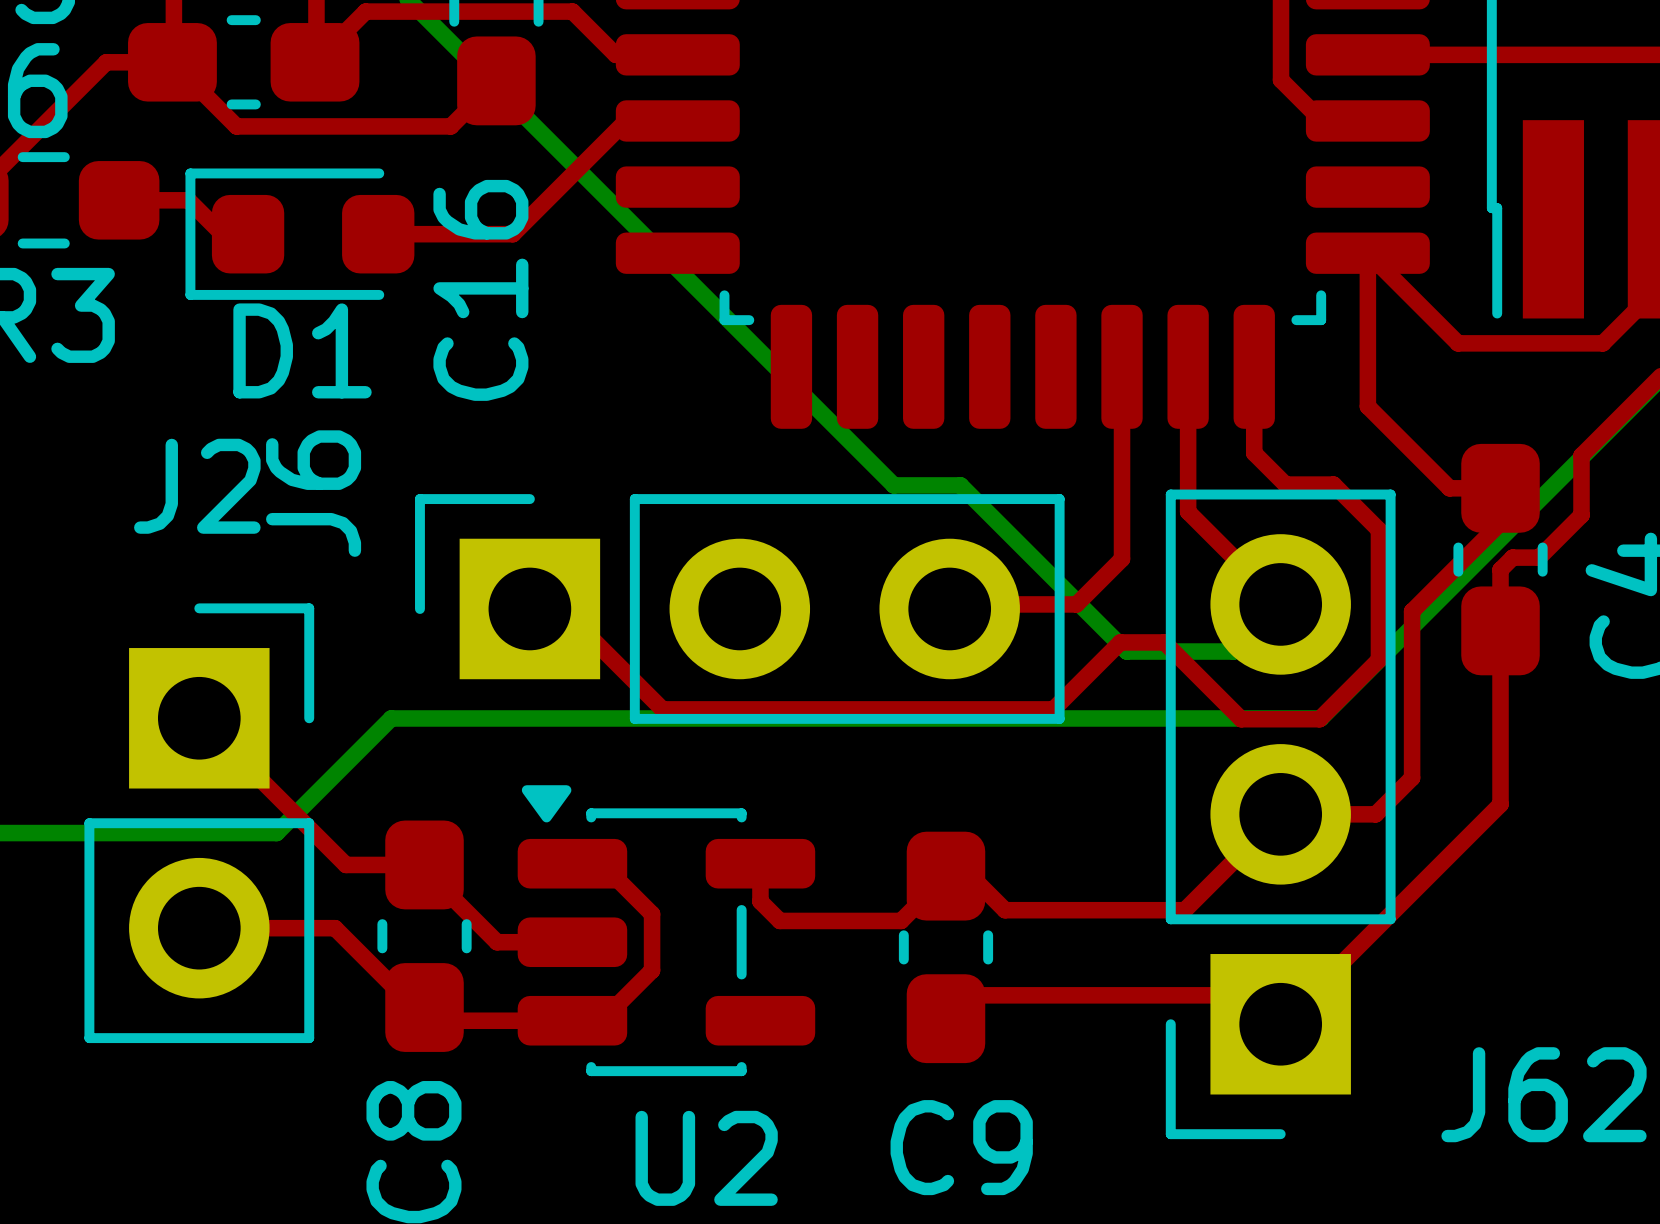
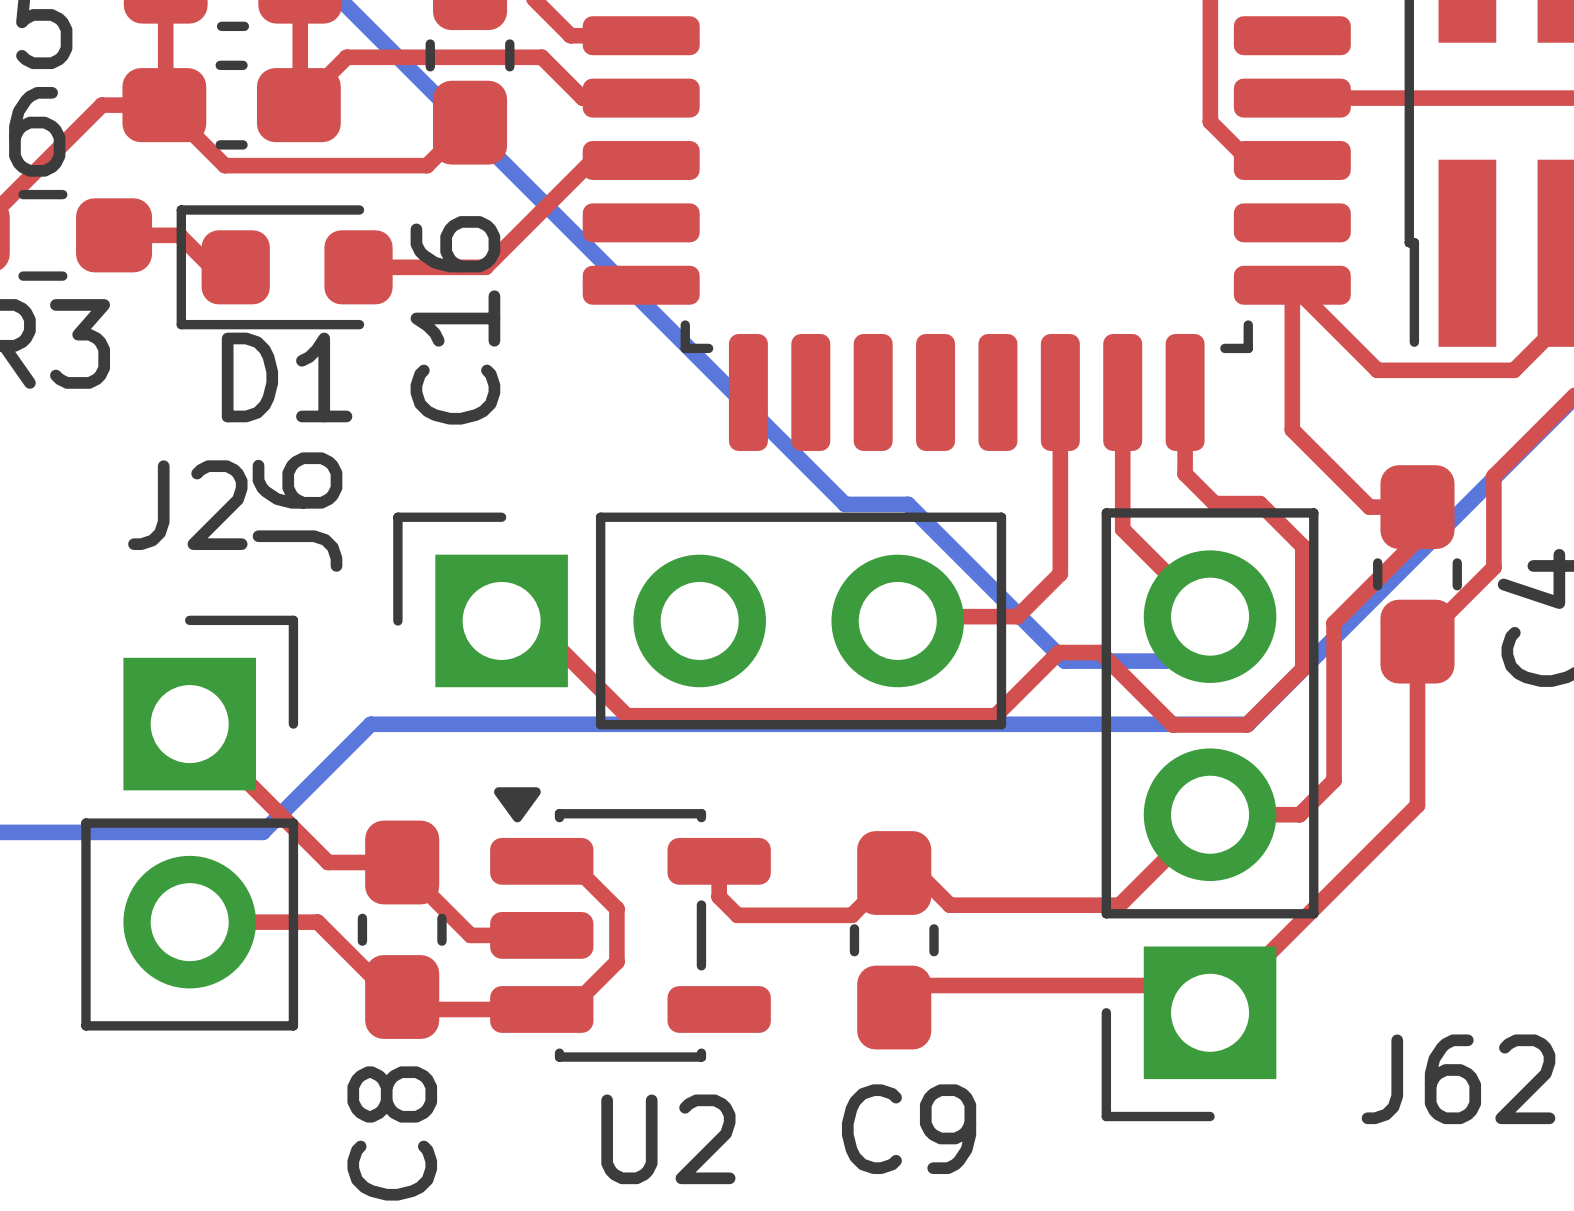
top track: (1581, 515) (1539, 557) (1512, 557) (1500, 569) (1500, 613) -> (1493, 532) (1493, 567) (1419, 641) (1417, 641)

